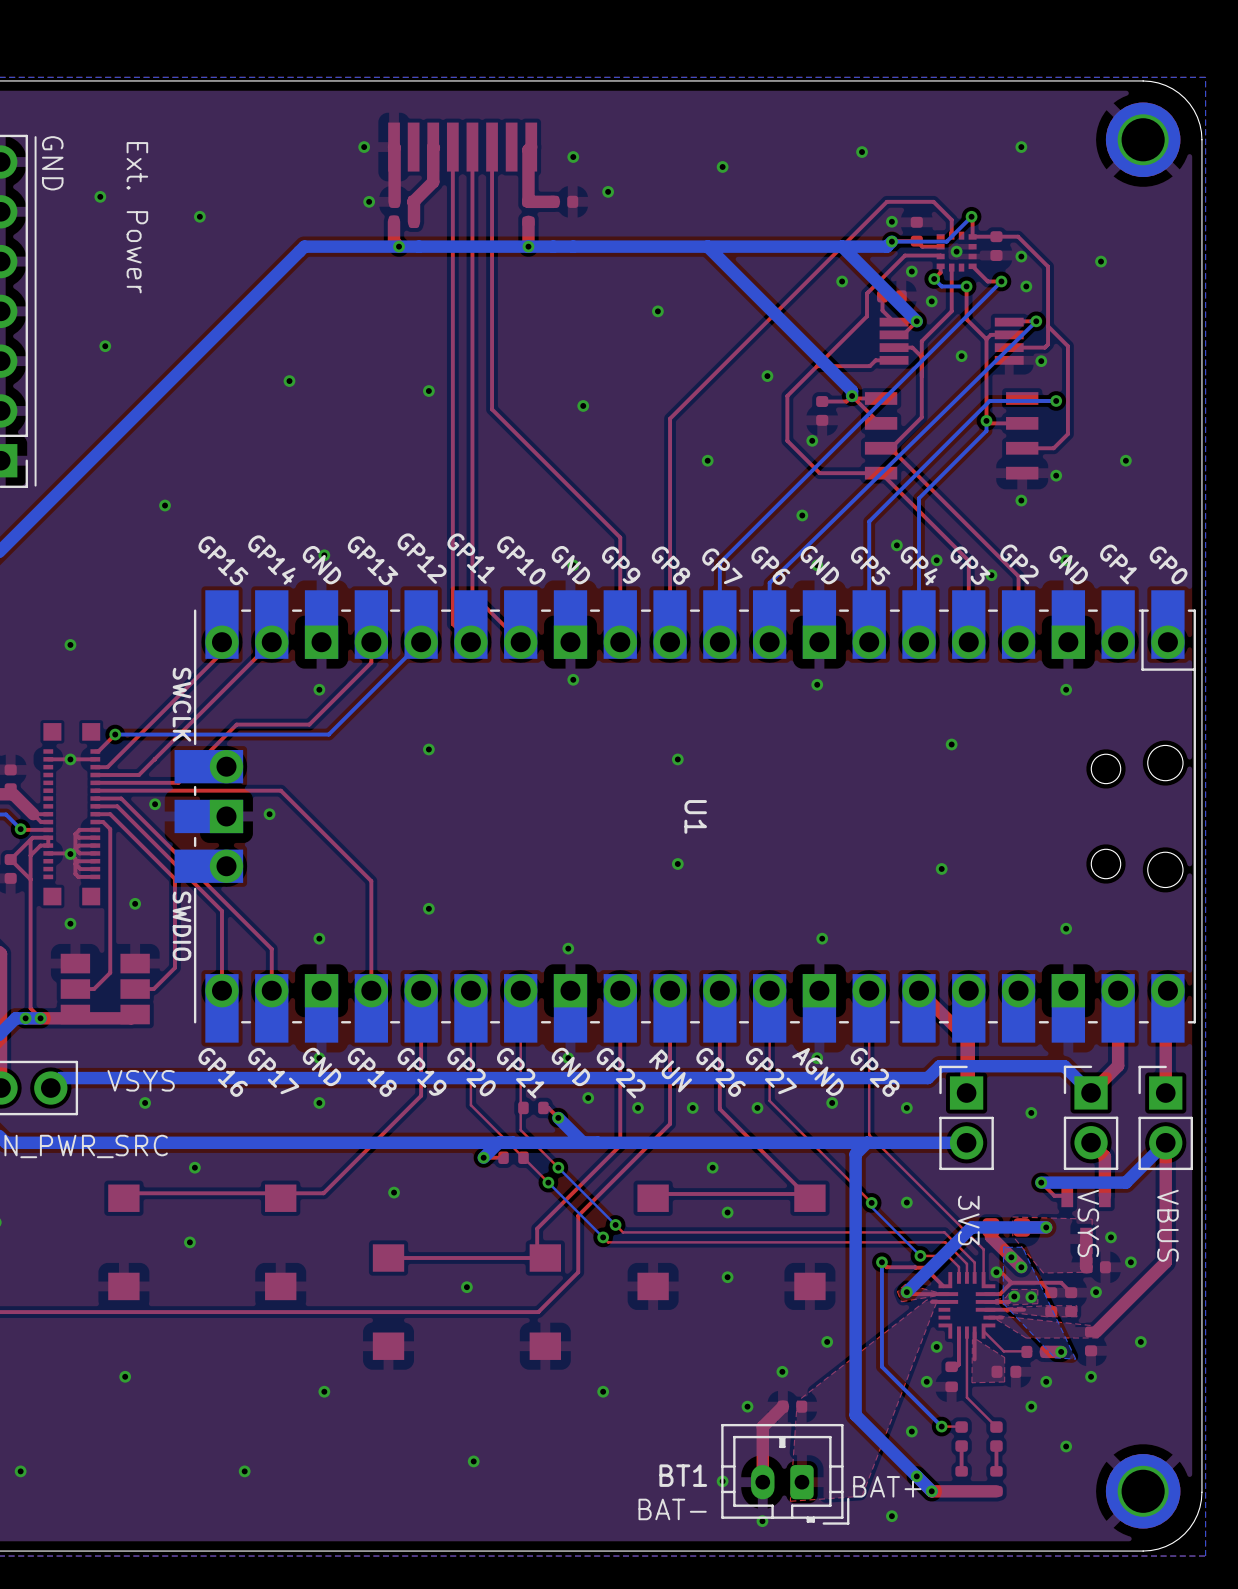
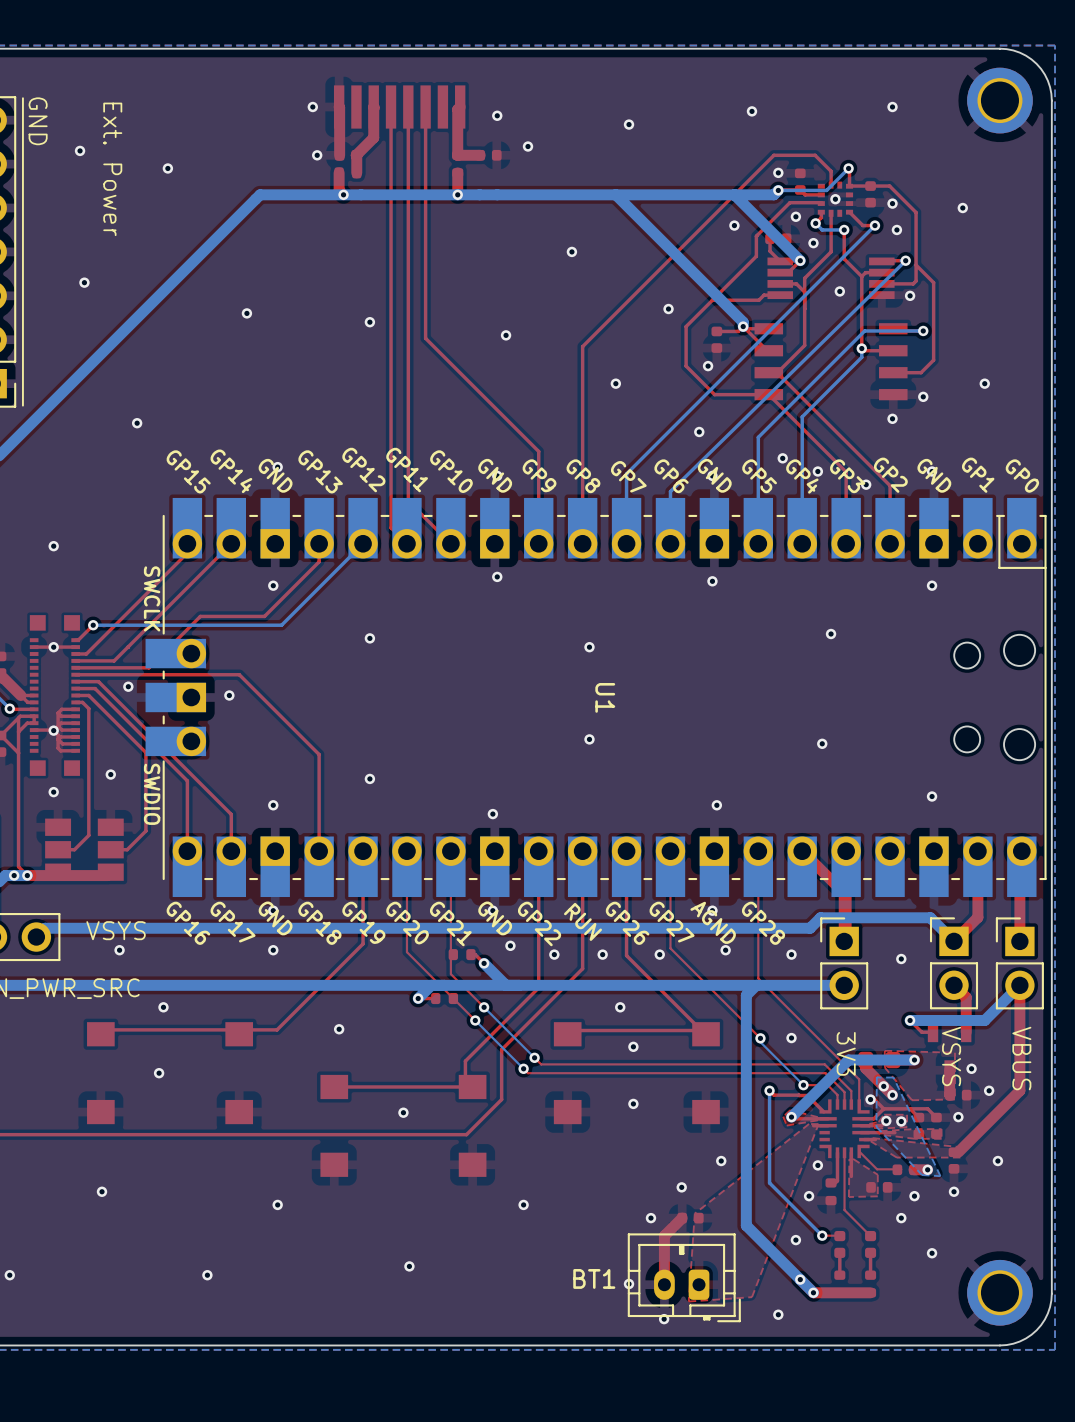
text: BAT+ (887, 1486) -> none
text: BAT- (672, 1509) -> none

